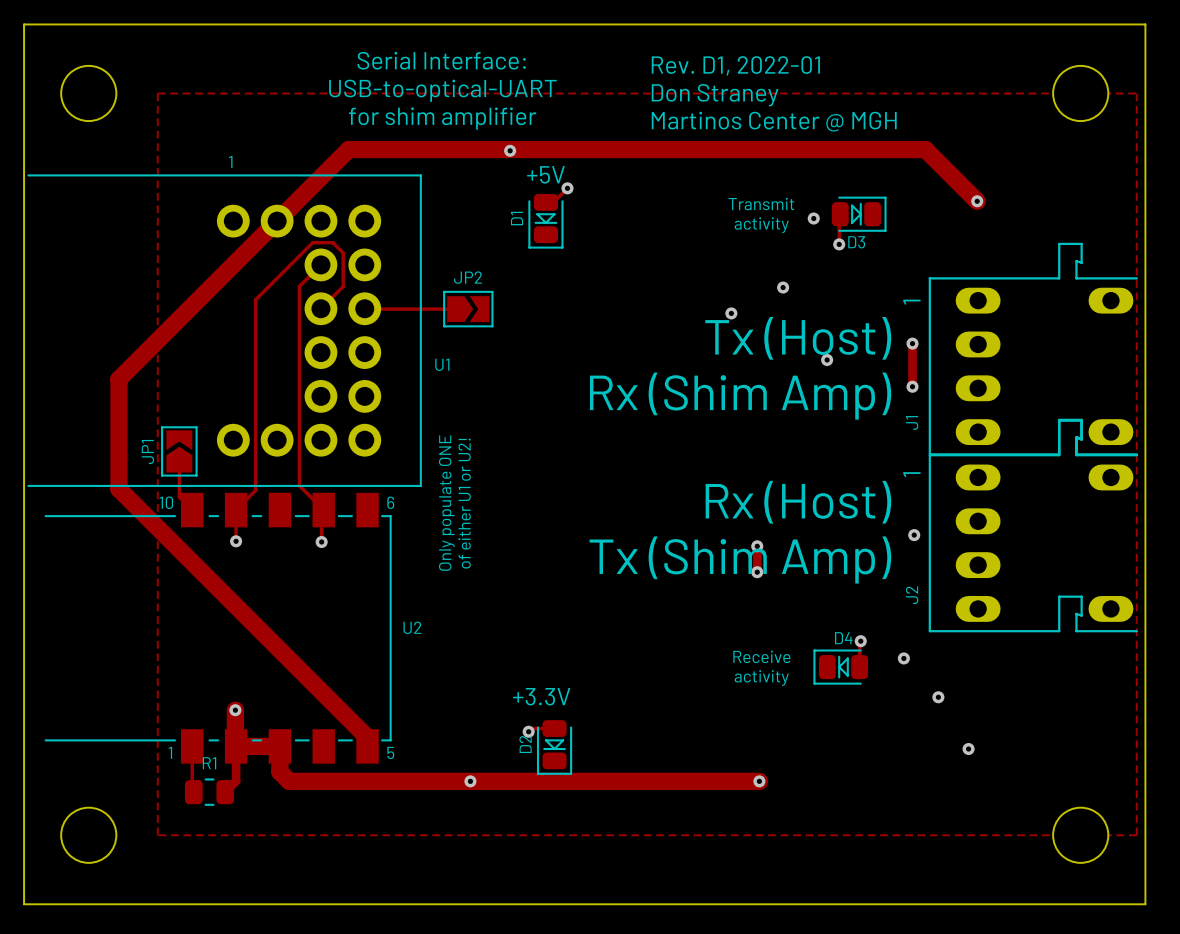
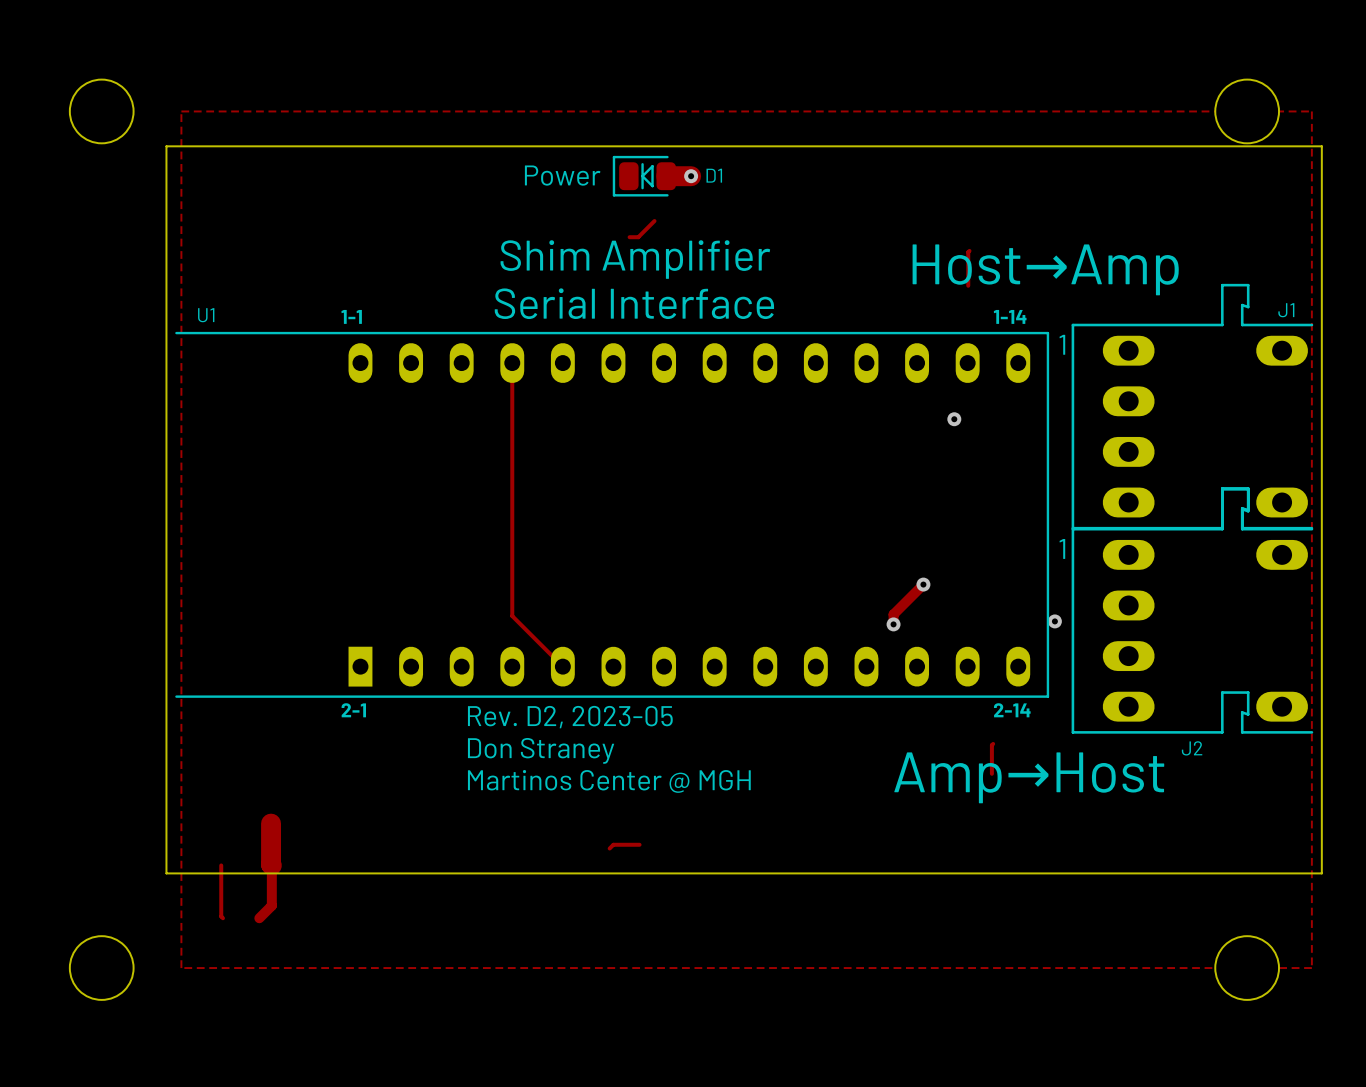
text: Serial Interface: (441, 60) -> none
text: Rev. D1, 2022-01 (735, 65) -> none
text: USB-to-optical-UART (442, 90) -> none
text: Don Straney (715, 95) -> none
text: for shim amplifier (442, 118) -> none
text: Martinos Center @ MGH (774, 121) -> none
board edge: (1145, 123) (1145, 24) (24, 24) (24, 904) (1145, 904) (1145, 753) -> (1321, 146) (166, 146) (166, 873) (1321, 873)
text: none -> Power (562, 175)
track: (577, 149) (348, 149) (118, 379) (118, 489) (367, 737) (367, 746) -> none
track: (599, 149) (925, 149) (977, 201) -> none
via: none -> (691, 176)
via: (510, 150) -> none
U1 footprint: [27, 174, 422, 487] -> [175, 331, 1050, 698]
text: +5V (545, 174) -> none
via: (567, 188) -> none
via: (977, 201) -> none
text: Transmit (761, 204) -> none
D3: (859, 214) -> none
D1 name position: D1 (517, 218) -> D1 (714, 175)
via: (813, 218) -> none
D1 rotation: 0° (545, 221) -> 90° clockwise (644, 176)
D1 position: (545, 221) -> (644, 176)
text: none -> Shim Amplifier (635, 259)
text: activity (761, 225) -> none
text: none -> Host→Amp (1045, 269)
via: (839, 244) -> none
text: none -> Serial Interface (634, 303)
track: (320, 264) (299, 286) (299, 485) (323, 510) (321, 512) (321, 542) -> none
via: (783, 287) -> none
J1 text rotation: 0° (911, 302) -> 90° clockwise (1062, 344)
track: (320, 308) (343, 286) (343, 253) (332, 242) (312, 242) (255, 299) (255, 490) (236, 510) (236, 541) -> none
track: (364, 308) (455, 309) -> none
JP2: (468, 309) -> none
track: none -> (512, 363) (512, 616) (562, 666)
via: (731, 313) -> none
text: Tx (Host) (798, 338) -> none
track: (912, 343) (912, 386) -> none
via: (912, 343) -> none
U1 name position: U1 (442, 364) -> U1 (206, 315)
via: (912, 386) -> none
text: Rx (Shim Amp) (740, 396) -> none
J1 name rotation: 0° (912, 423) -> 90° clockwise (1286, 310)
J1 name position: J1 (912, 423) -> J1 (1286, 310)
JP1: (179, 451) -> none
track: (179, 463) (179, 497) (192, 510) -> none
J2 text rotation: 0° (911, 474) -> 90° clockwise (1062, 548)
text: Rx (Host) (798, 502) -> none
text: Only populate ONE (446, 503) -> none
text: of either U1 or U2! (464, 503) -> none
track: none -> (923, 584) (893, 614) (893, 624)
via: none -> (923, 584)
via: none -> (893, 624)
via: (236, 541) -> none
via: (321, 542) -> none
track: (757, 546) (757, 572) -> none
via: (757, 546) -> none
text: Tx (Shim Amp) (740, 559) -> none
via: (757, 572) -> none
J2 name rotation: 0° (912, 595) -> 90° clockwise (1192, 748)
J2 name position: J2 (912, 595) -> J2 (1192, 748)
text: none -> Rev. D2, 2023-05 (570, 717)
U2: (218, 628) -> none
via: (860, 641) -> none
text: none -> Don Straney (541, 750)
text: Receive (761, 656) -> none
via: (903, 658) -> none
D4: (840, 667) -> none
text: none -> Amp→Host (1029, 777)
text: none -> Martinos Center @ MGH (609, 781)
text: activity (761, 677) -> none
text: +3.3V (541, 696) -> none
via: (938, 697) -> none
via: (235, 710) -> none
via: (528, 731) -> none
track: (236, 746) (279, 746) (279, 771) (289, 781) (759, 781) -> none
D2: (554, 747) -> none
via: (968, 749) -> none
via: (470, 781) -> none
via: (759, 781) -> none
R1: (209, 792) -> none

